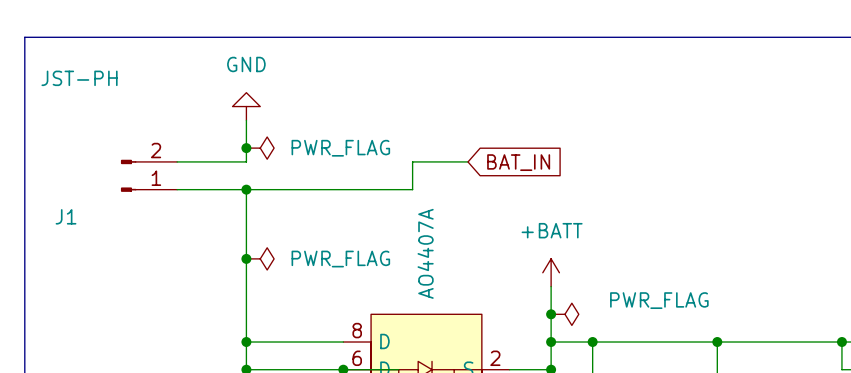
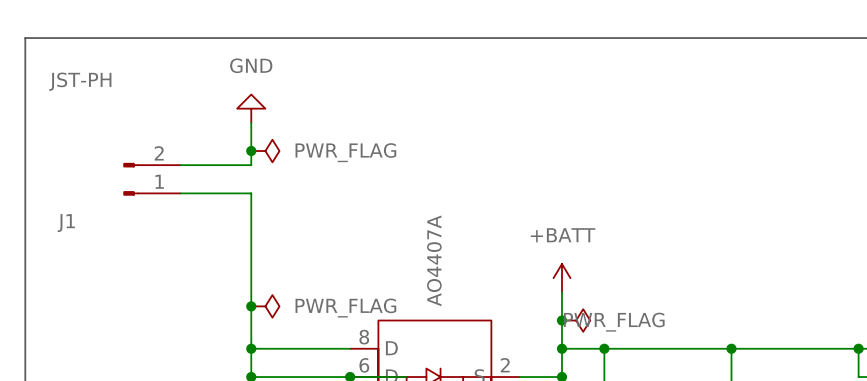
wire: (468, 161) (412, 161) (412, 189) (246, 189) -> none
global label: BAT_IN (518, 162) -> none
junction: (246, 189) -> none
junction position: (246, 258) -> (251, 306)
power symbol position: PWR_FLAG (260, 258) -> PWR_FLAG (265, 306)
power symbol text position: PWR_FLAG (659, 300) -> PWR_FLAG (614, 322)

